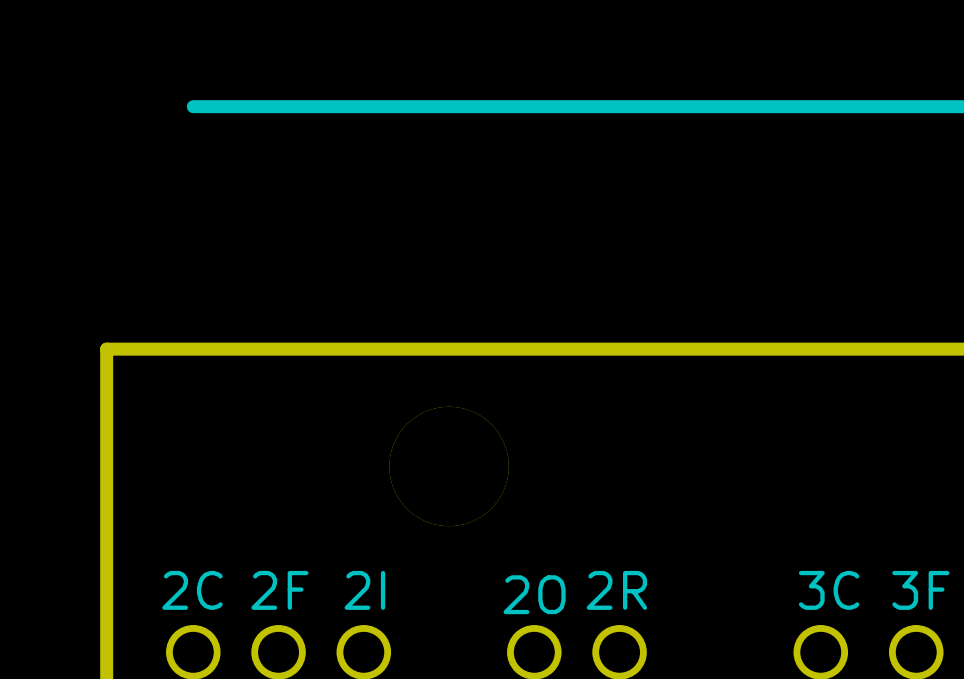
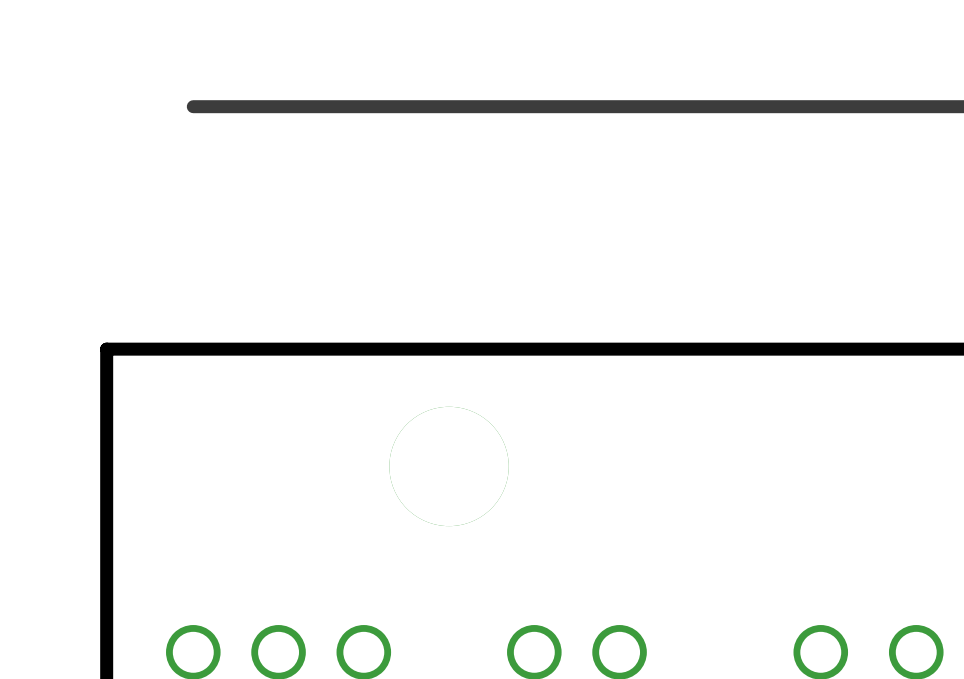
text: 2C (192, 590) -> none
text: 2F (279, 590) -> none
text: 2I (364, 590) -> none
text: 2R (616, 590) -> none
text: 3C (829, 590) -> none
text: 3F (920, 590) -> none
text: 2O (534, 594) -> none

